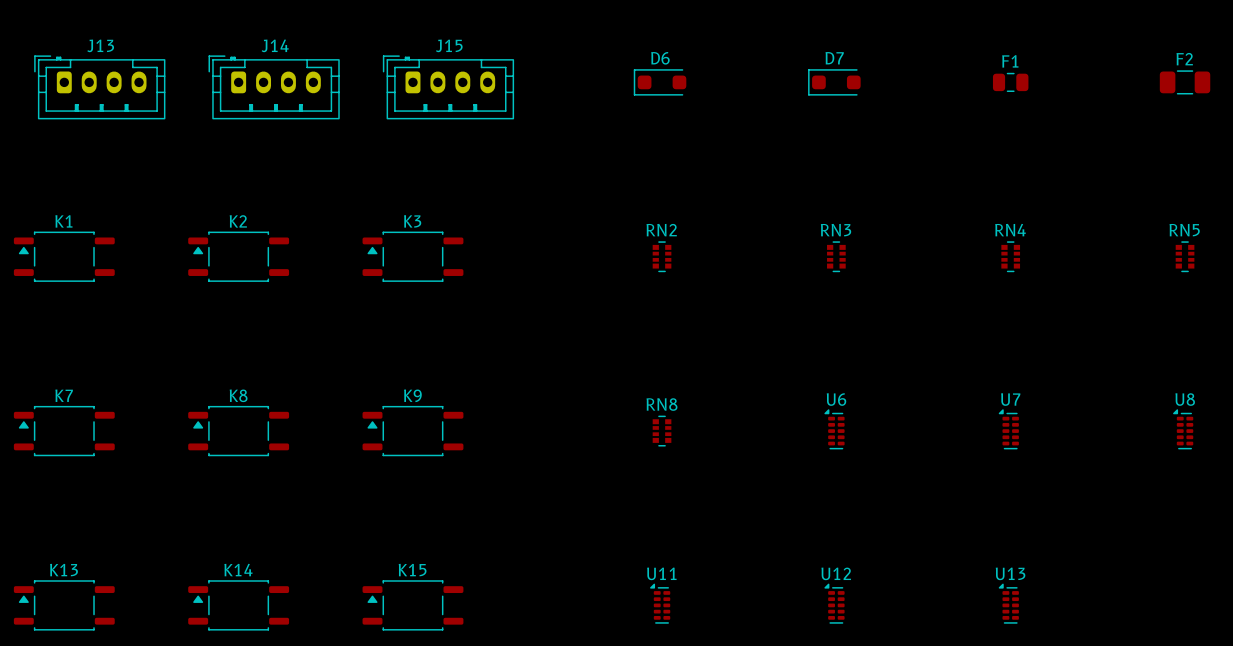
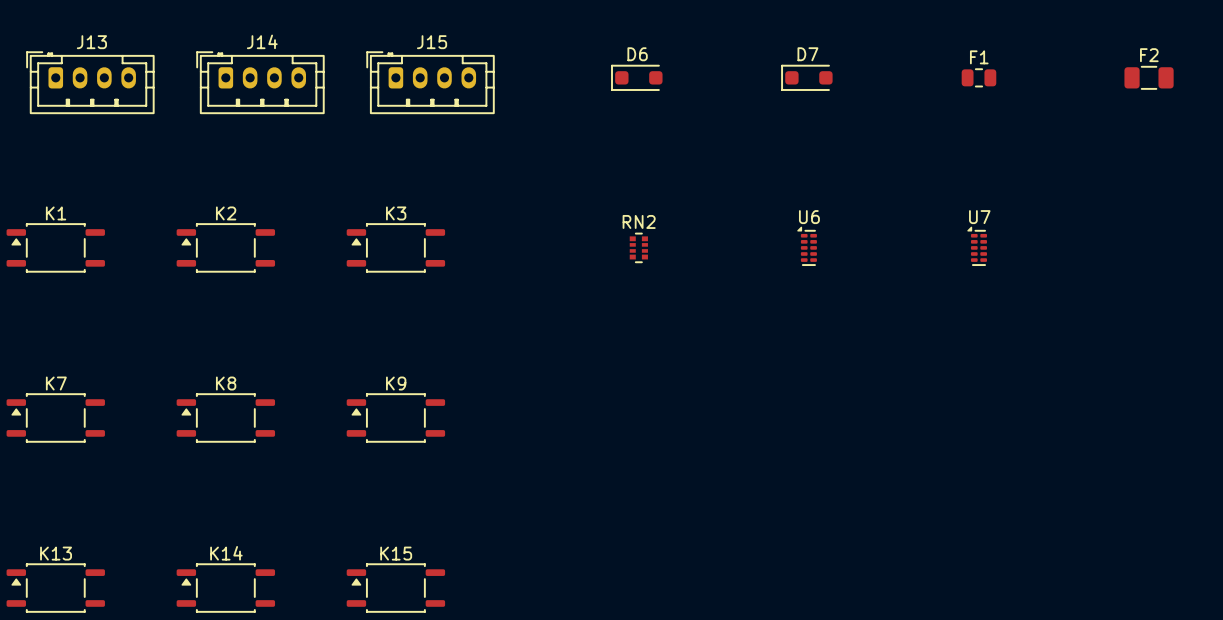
RN3: (836, 256) -> none
RN4: (1010, 256) -> none
RN5: (1185, 256) -> none
U6 position: (834, 429) -> (807, 246)
U7 position: (1008, 429) -> (977, 246)
U8: (1183, 429) -> none
RN8: (662, 431) -> none
U11: (660, 603) -> none
U12: (834, 603) -> none
U13: (1008, 603) -> none

